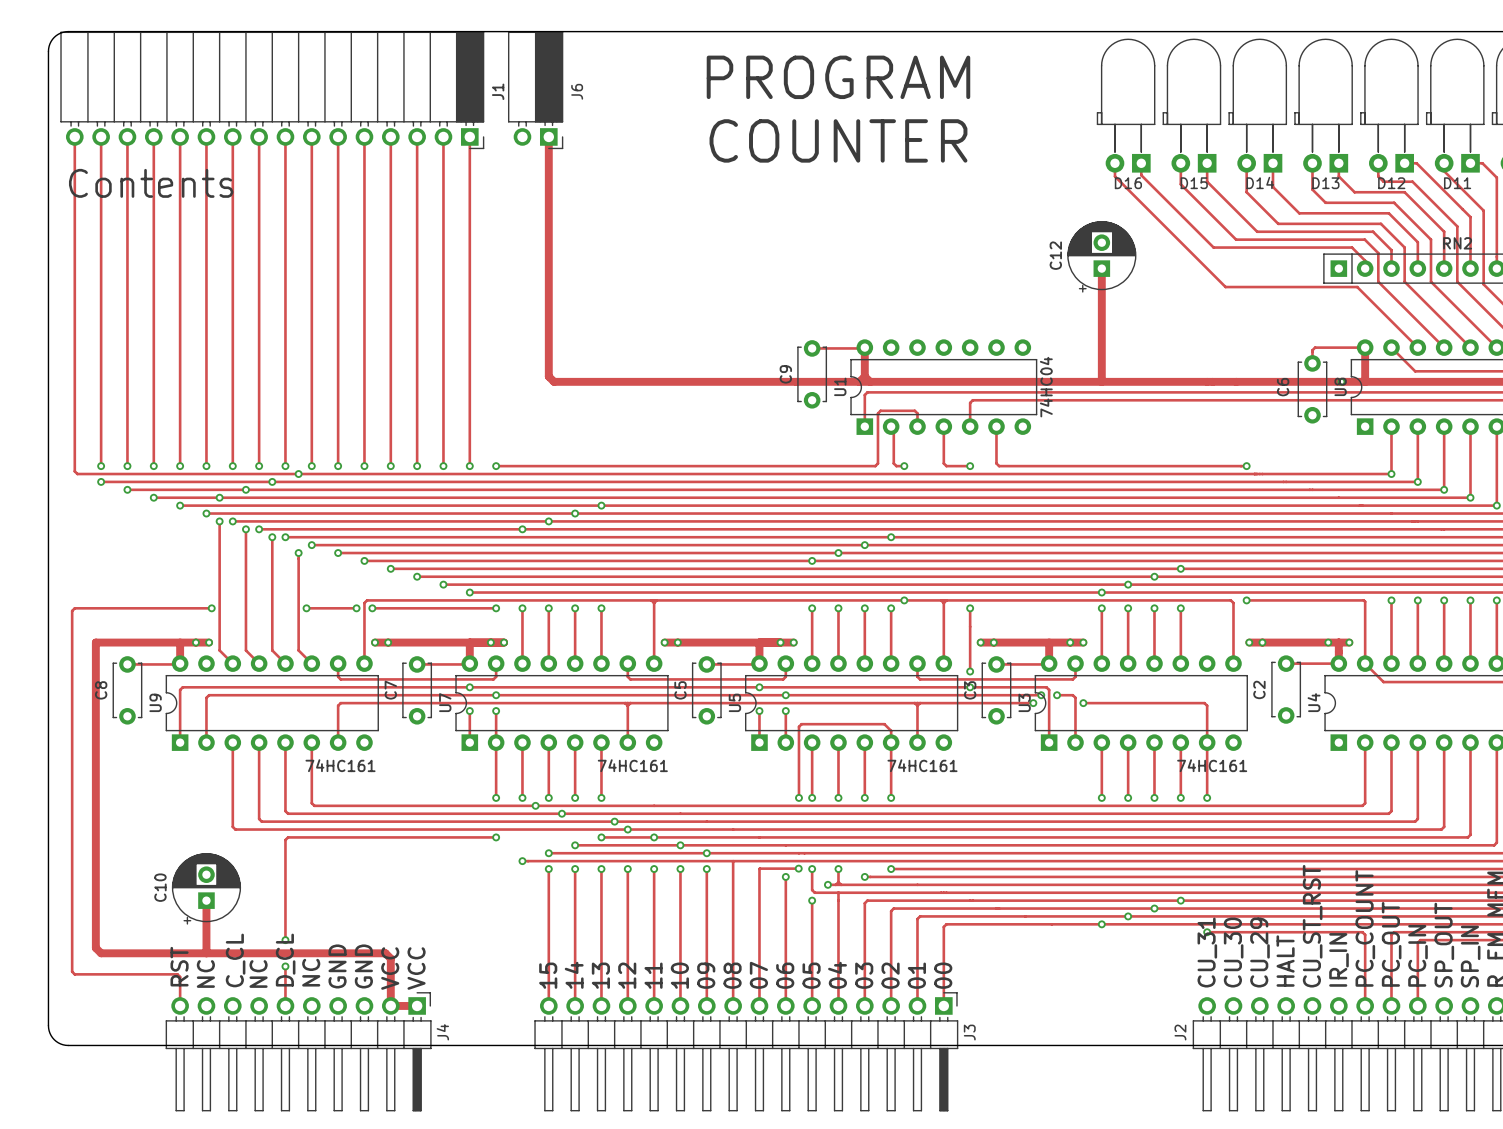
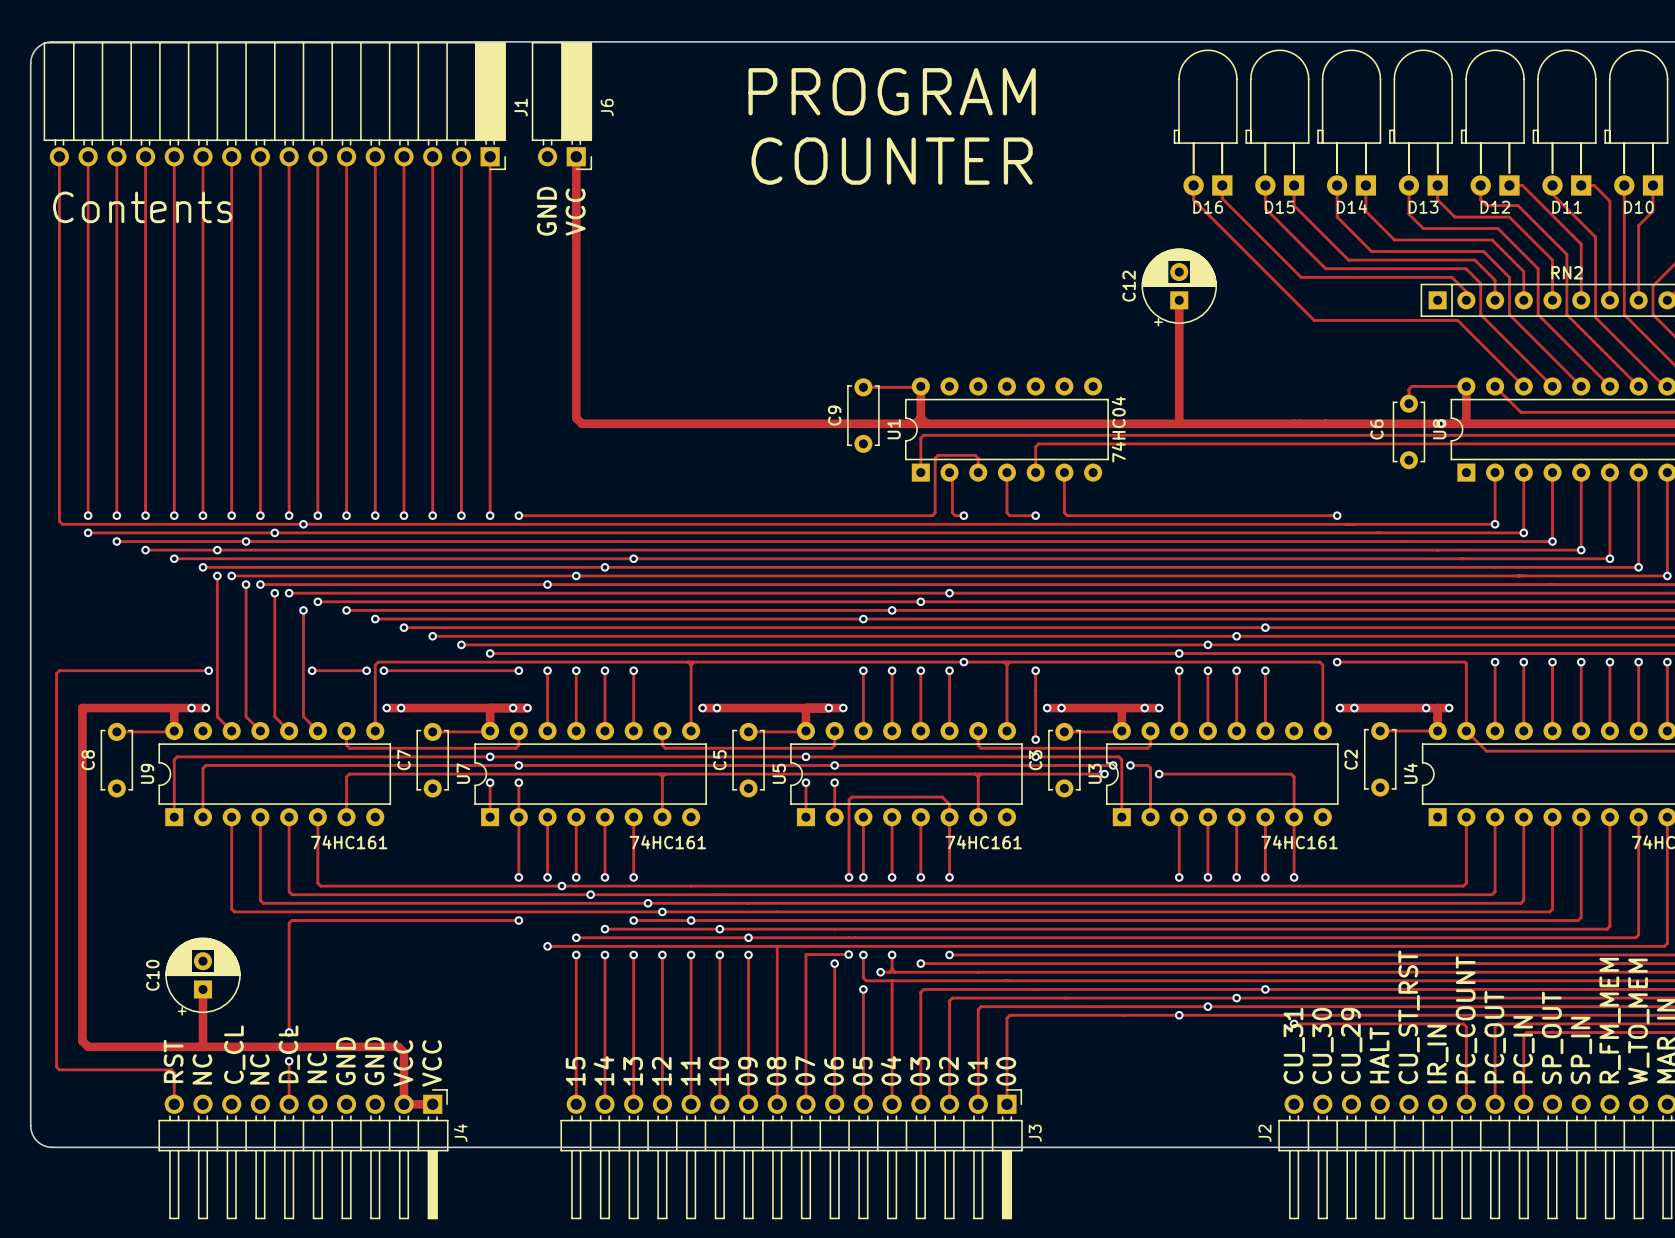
text: none -> GND (546, 211)
text: none -> VCC (575, 212)

